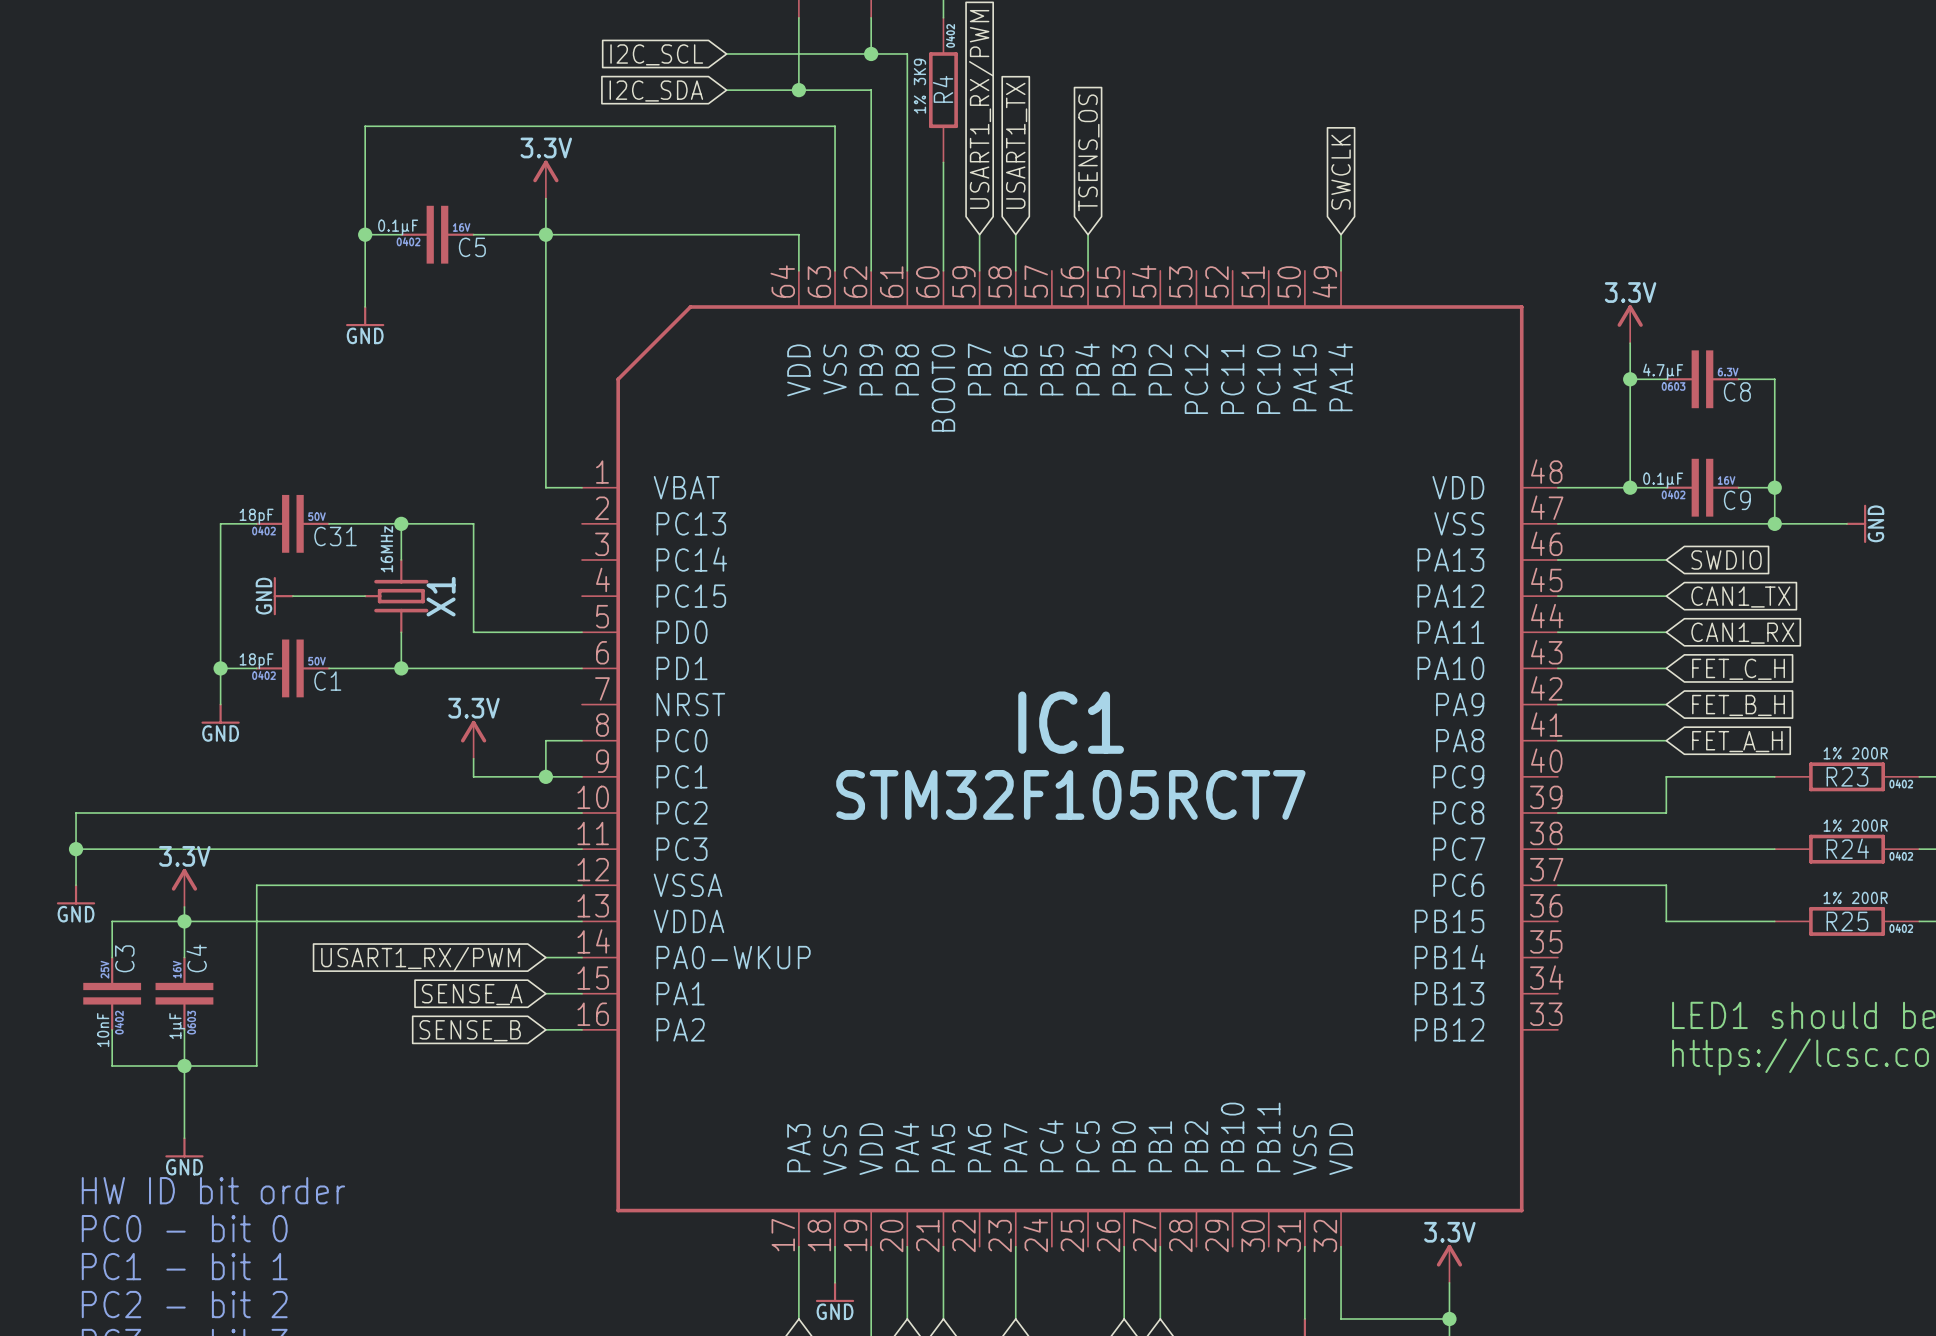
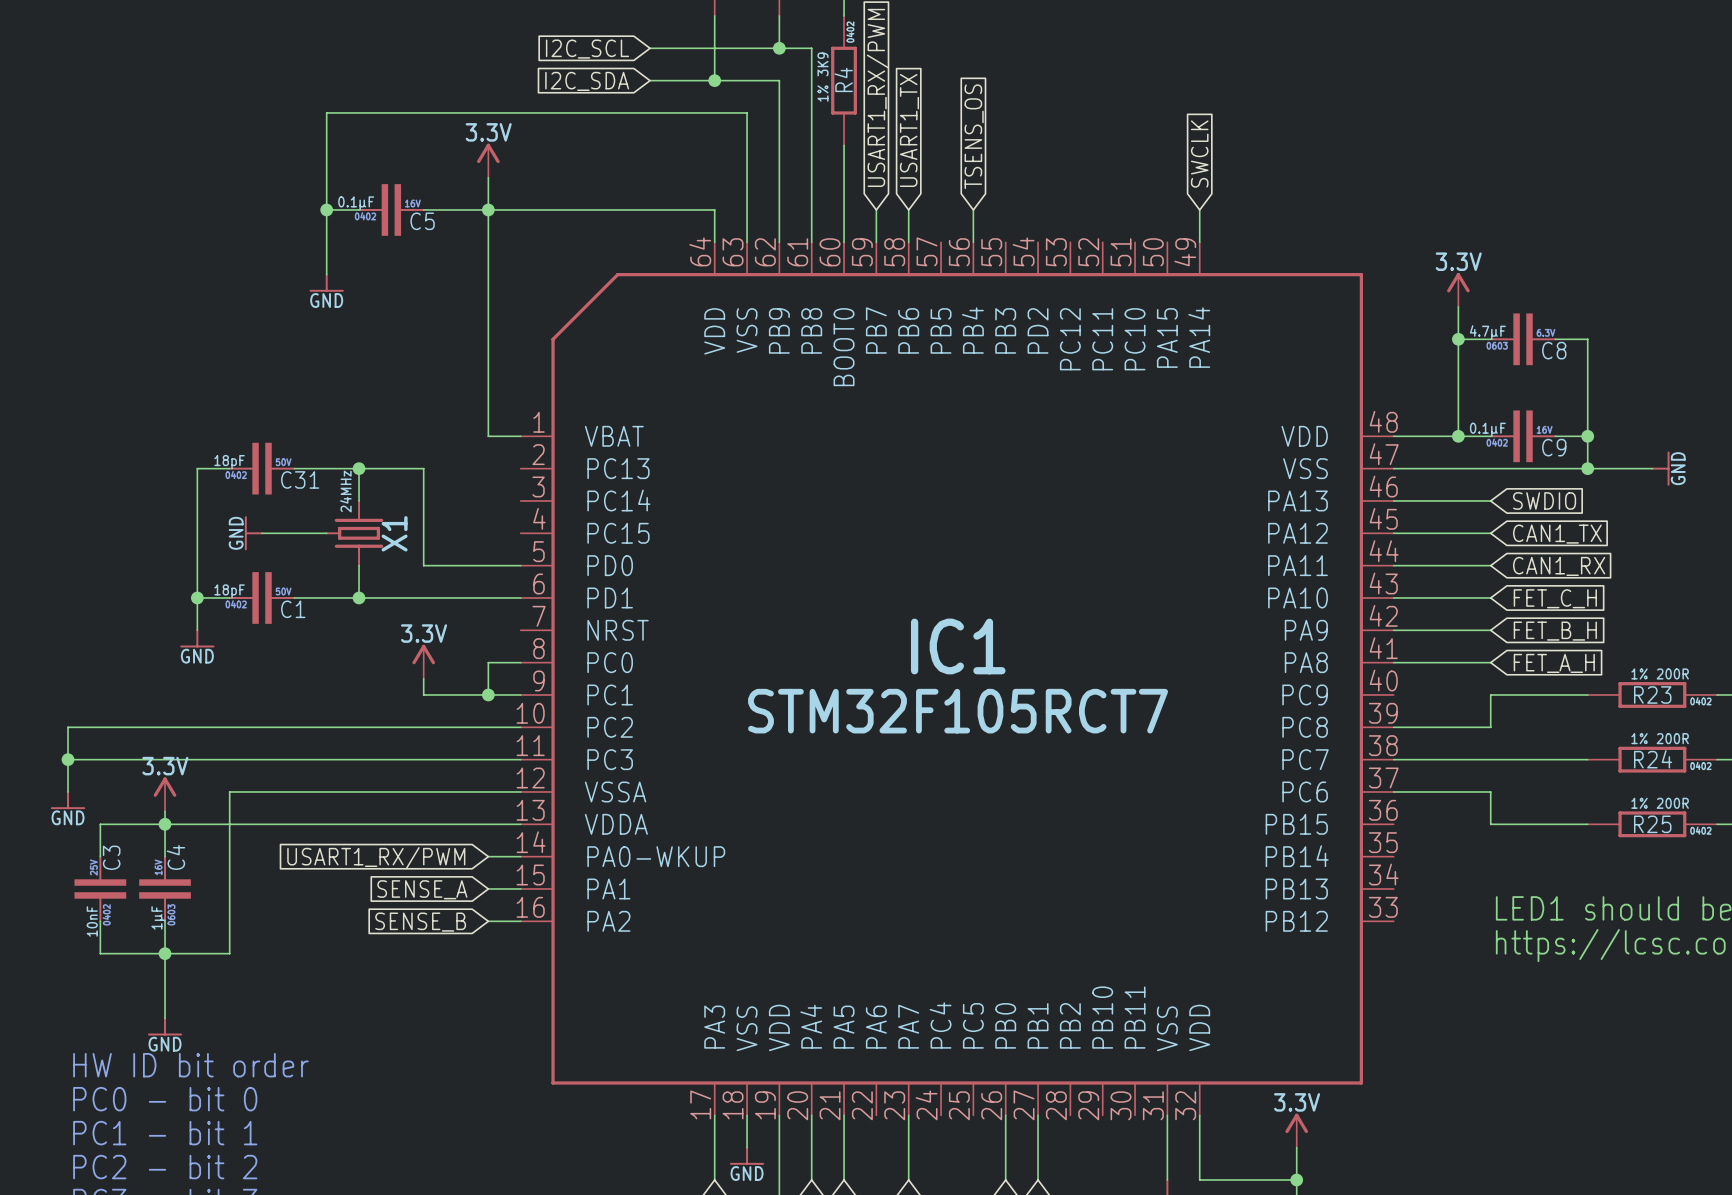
X1 value: 16MHz (386, 549) -> 24MHz (345, 491)

